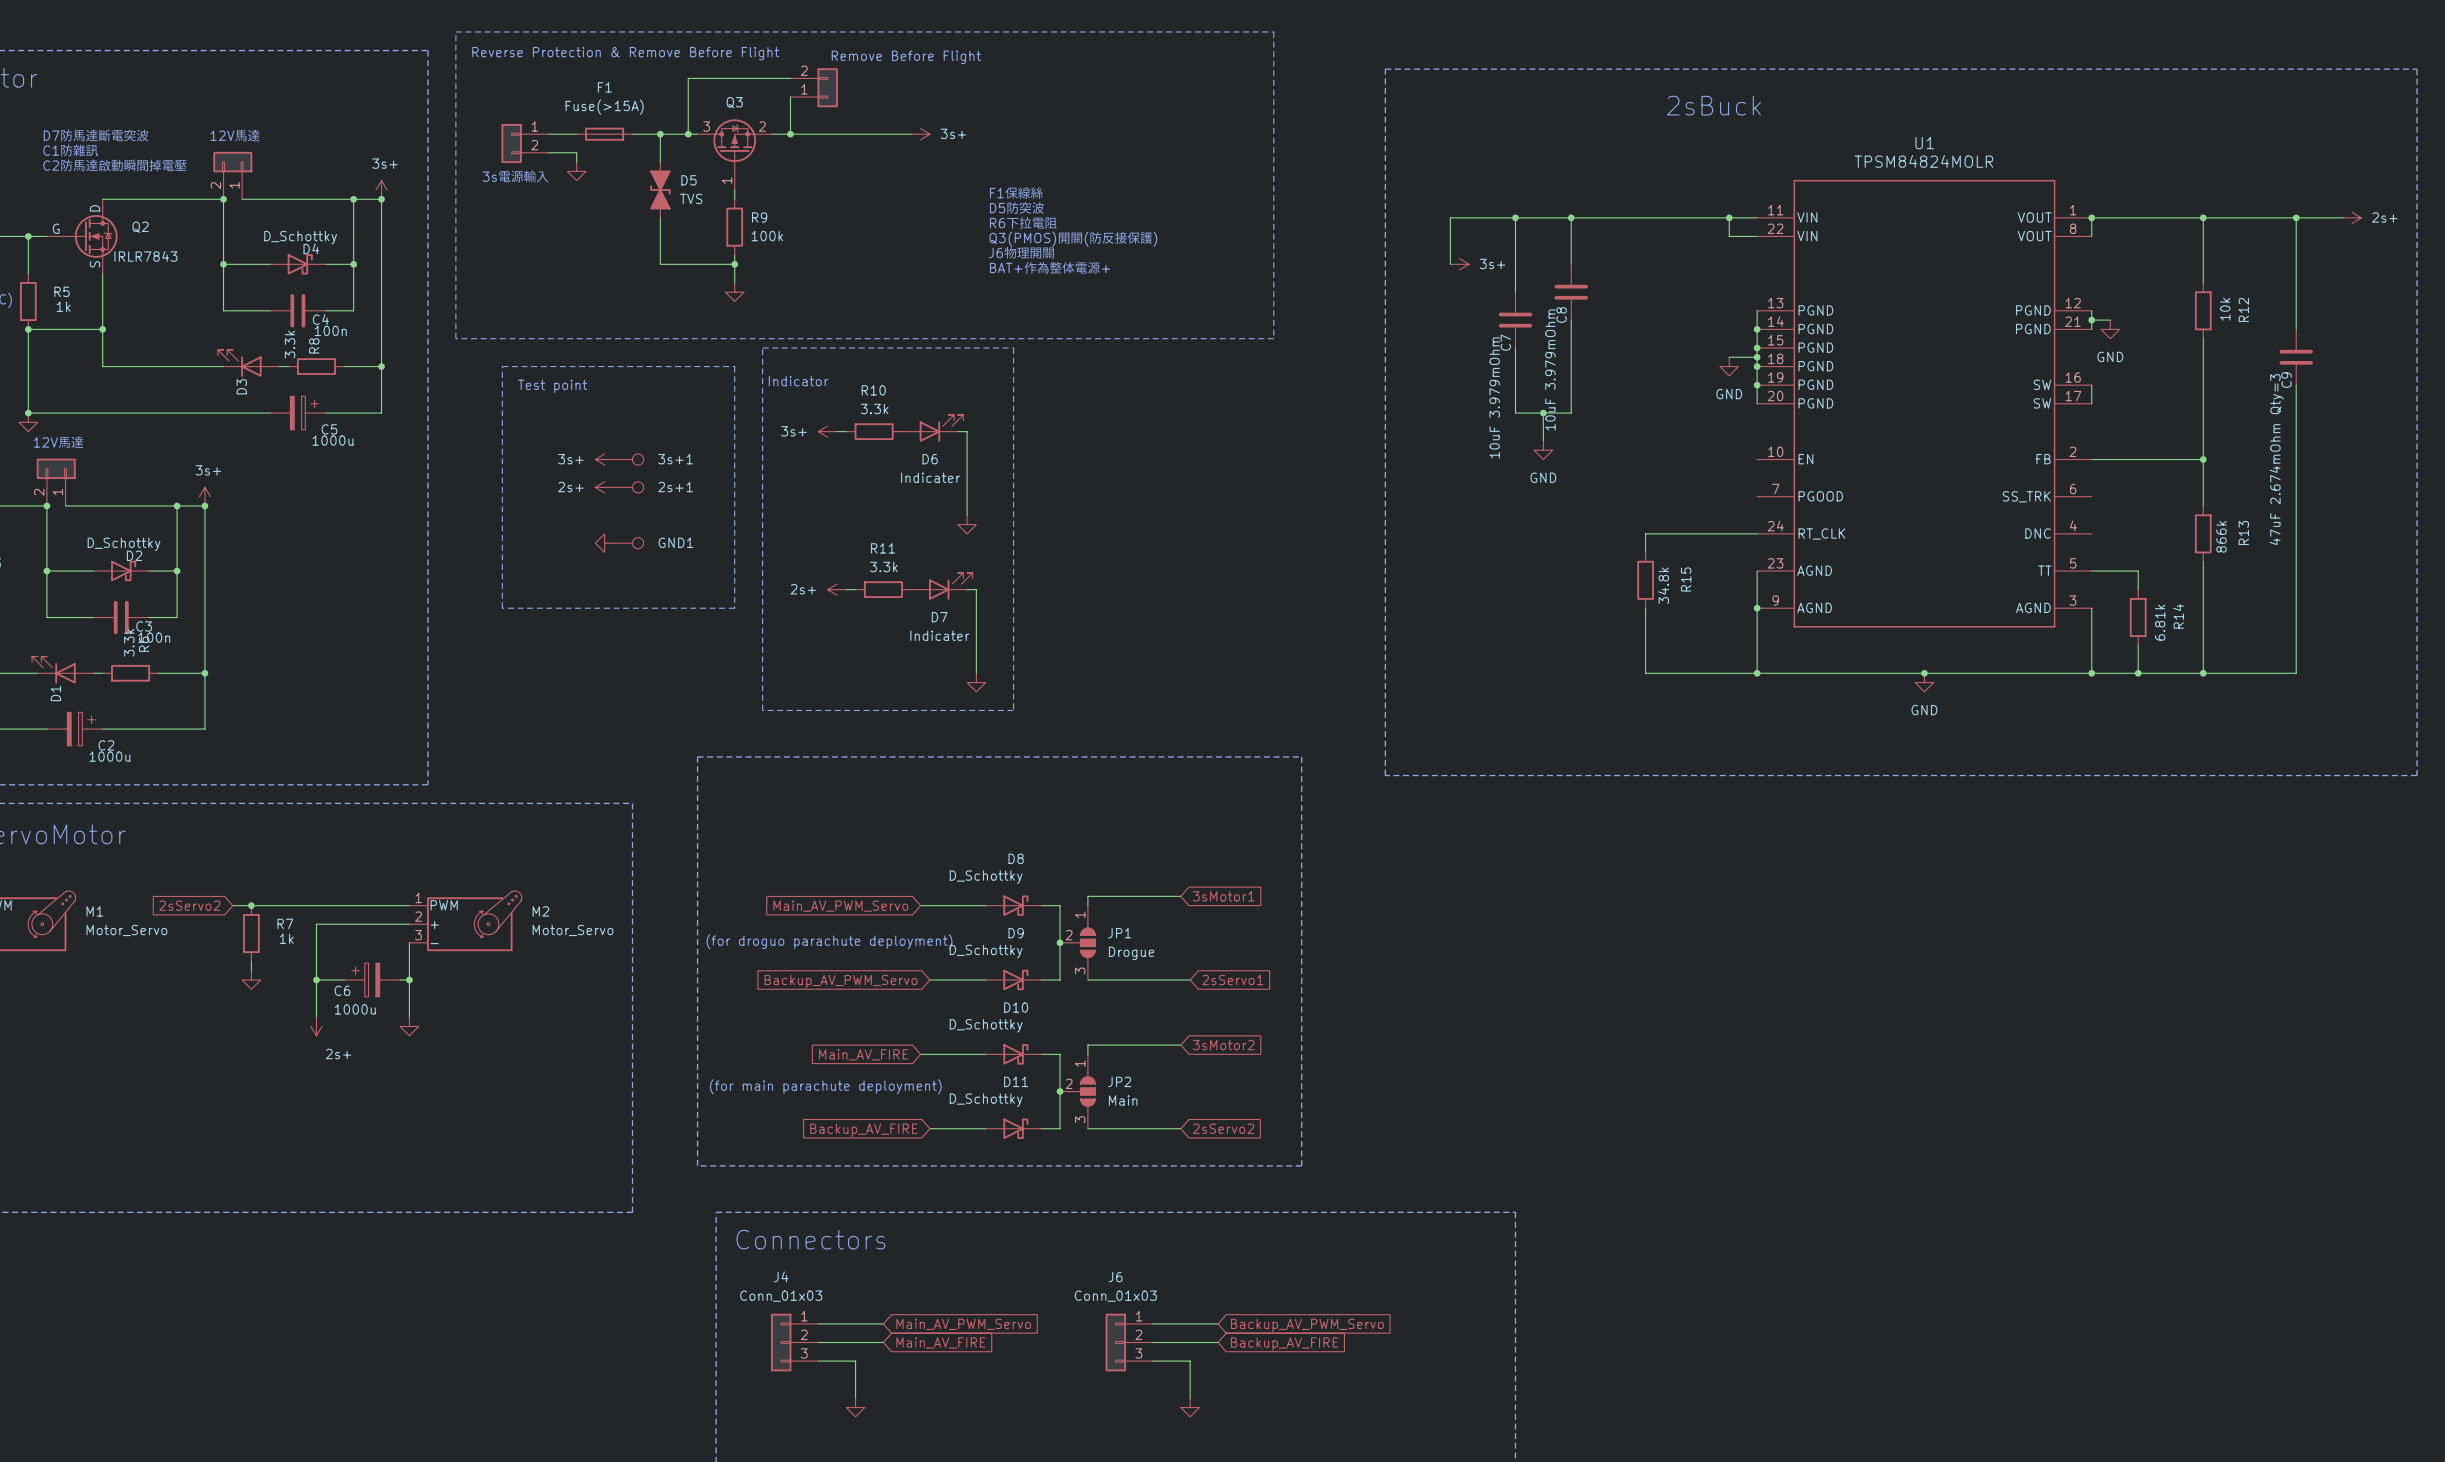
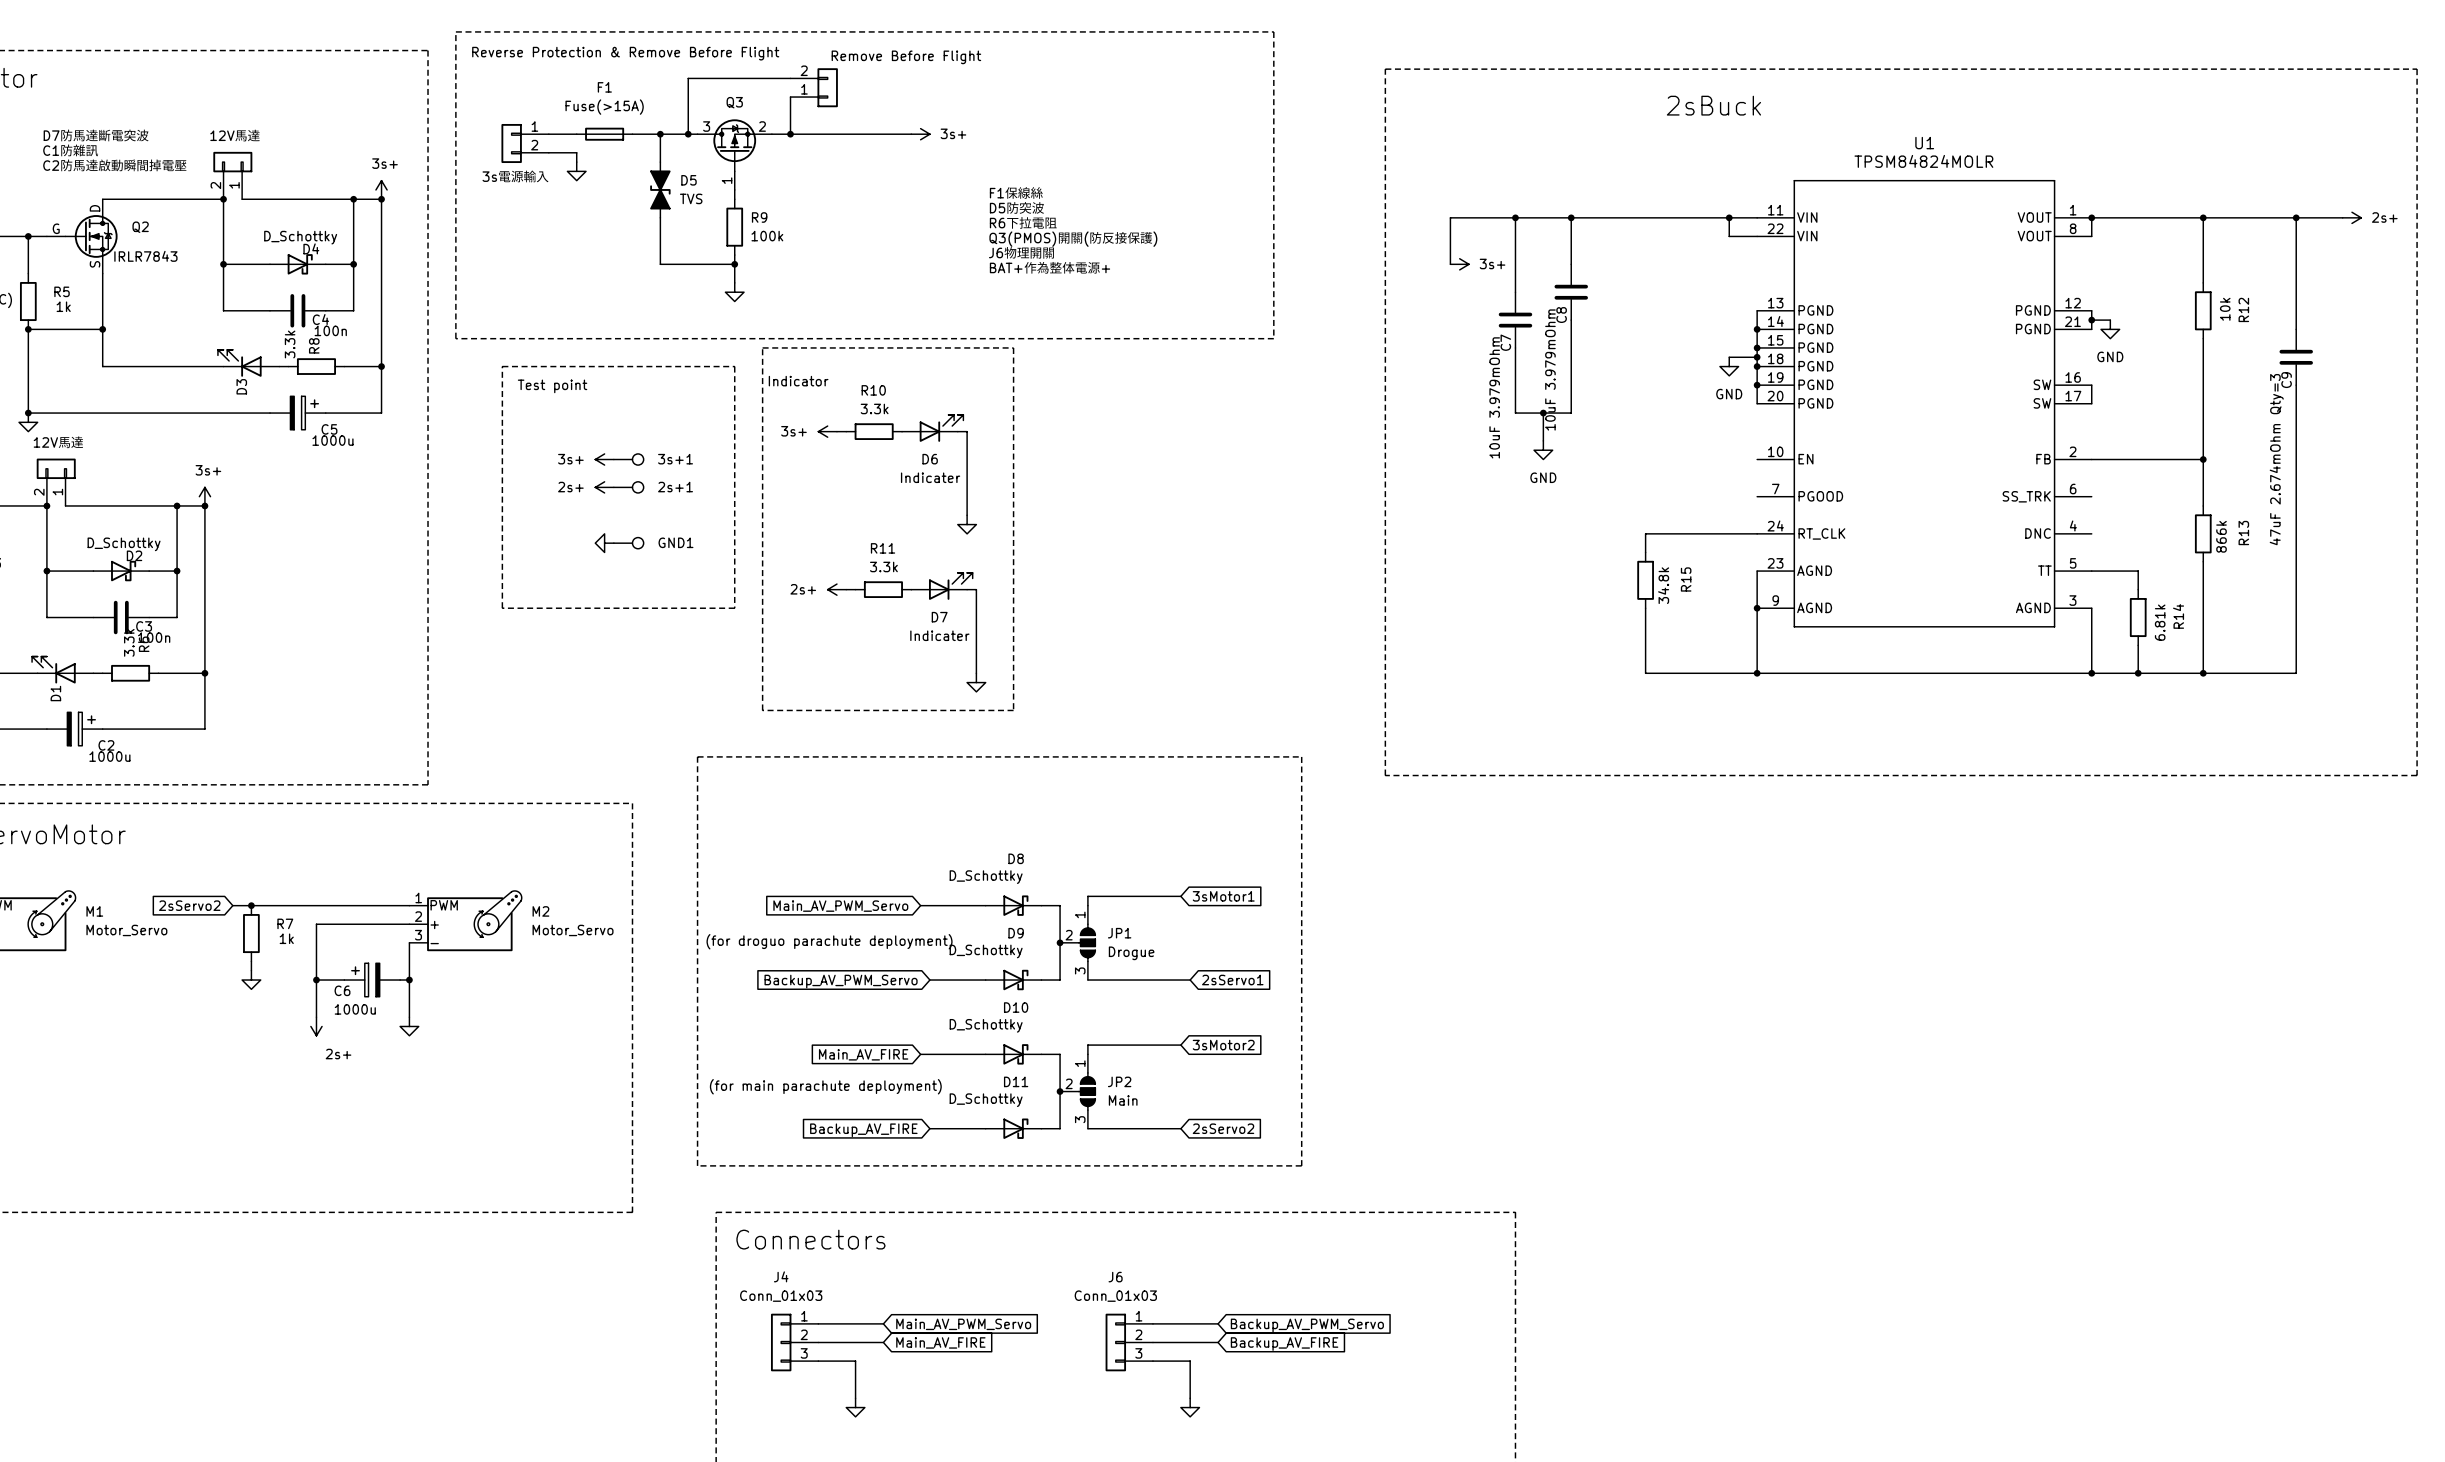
junction: (1924, 673) -> none
power symbol: GND (1924, 682) -> none

